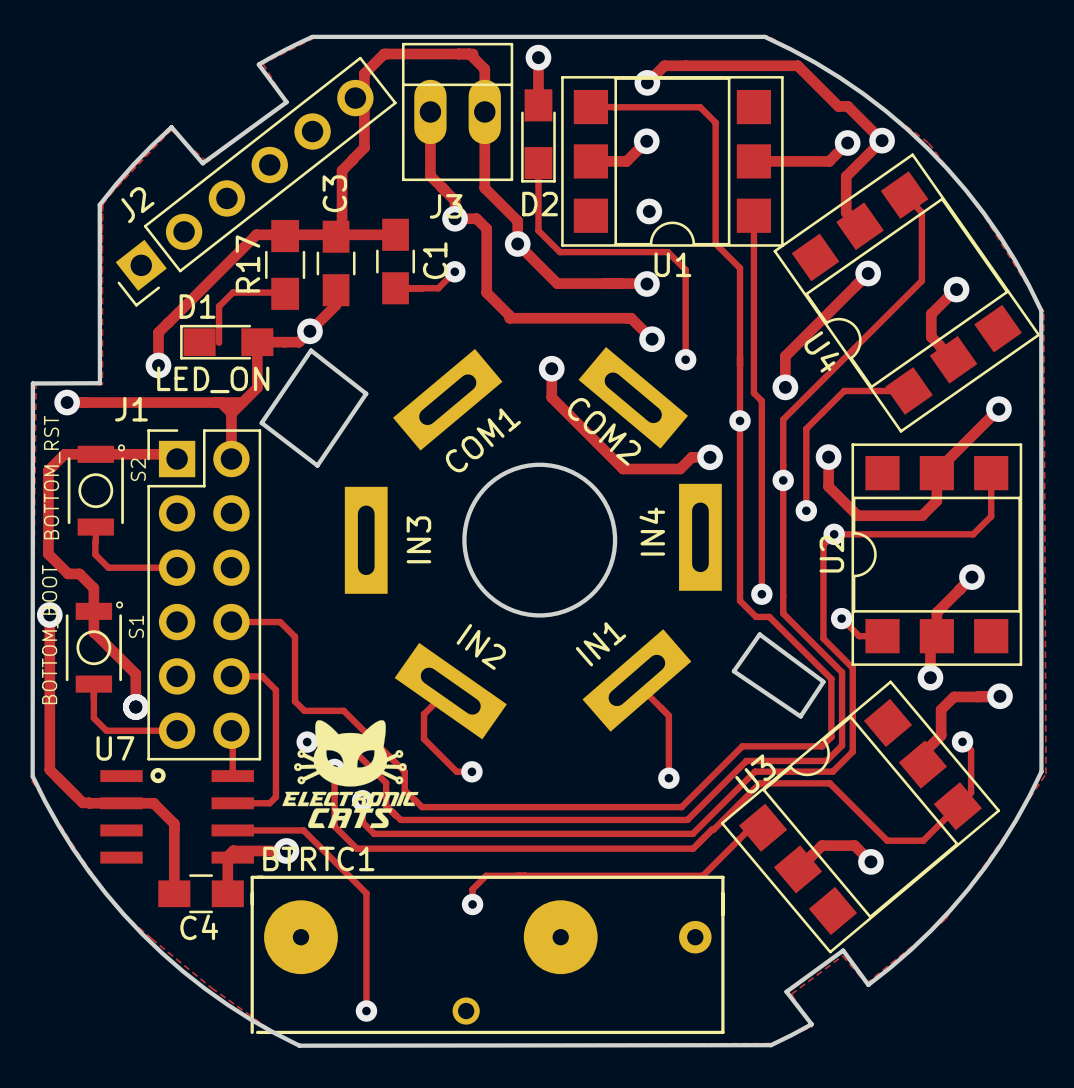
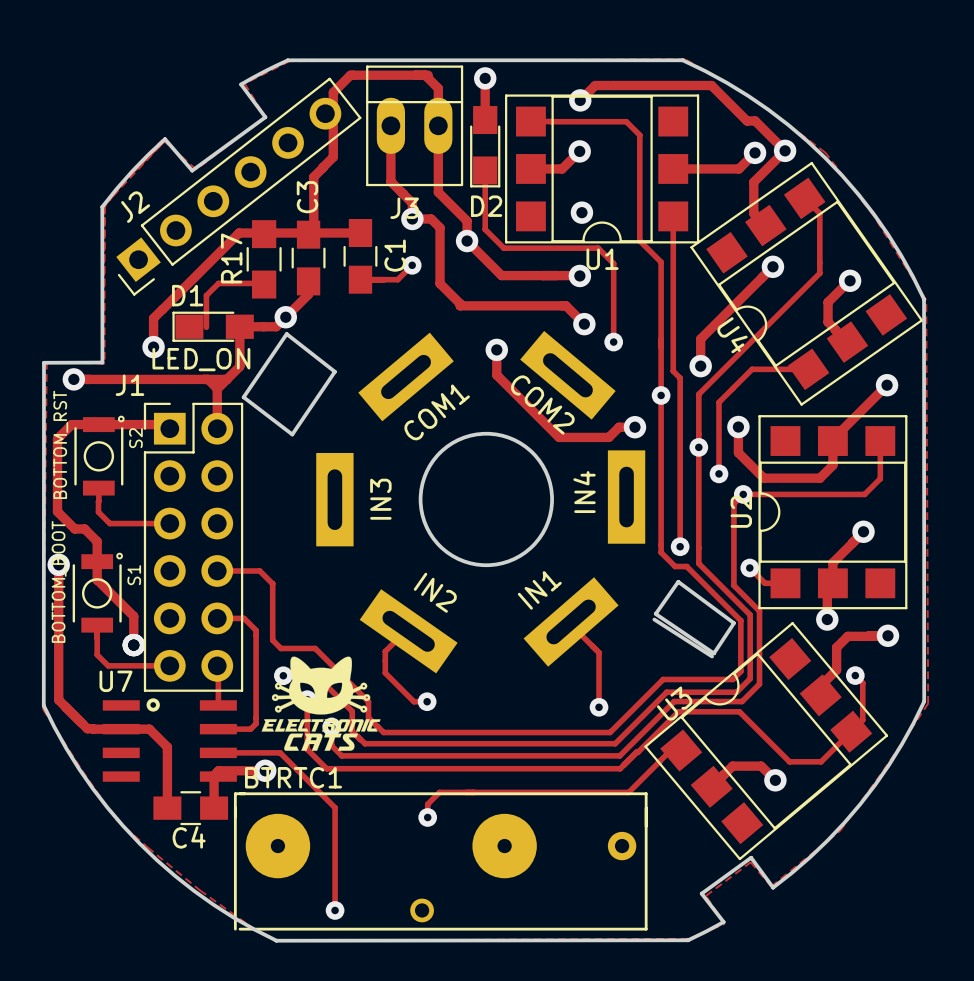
board edge: none -> (654, 619) (712, 656)

